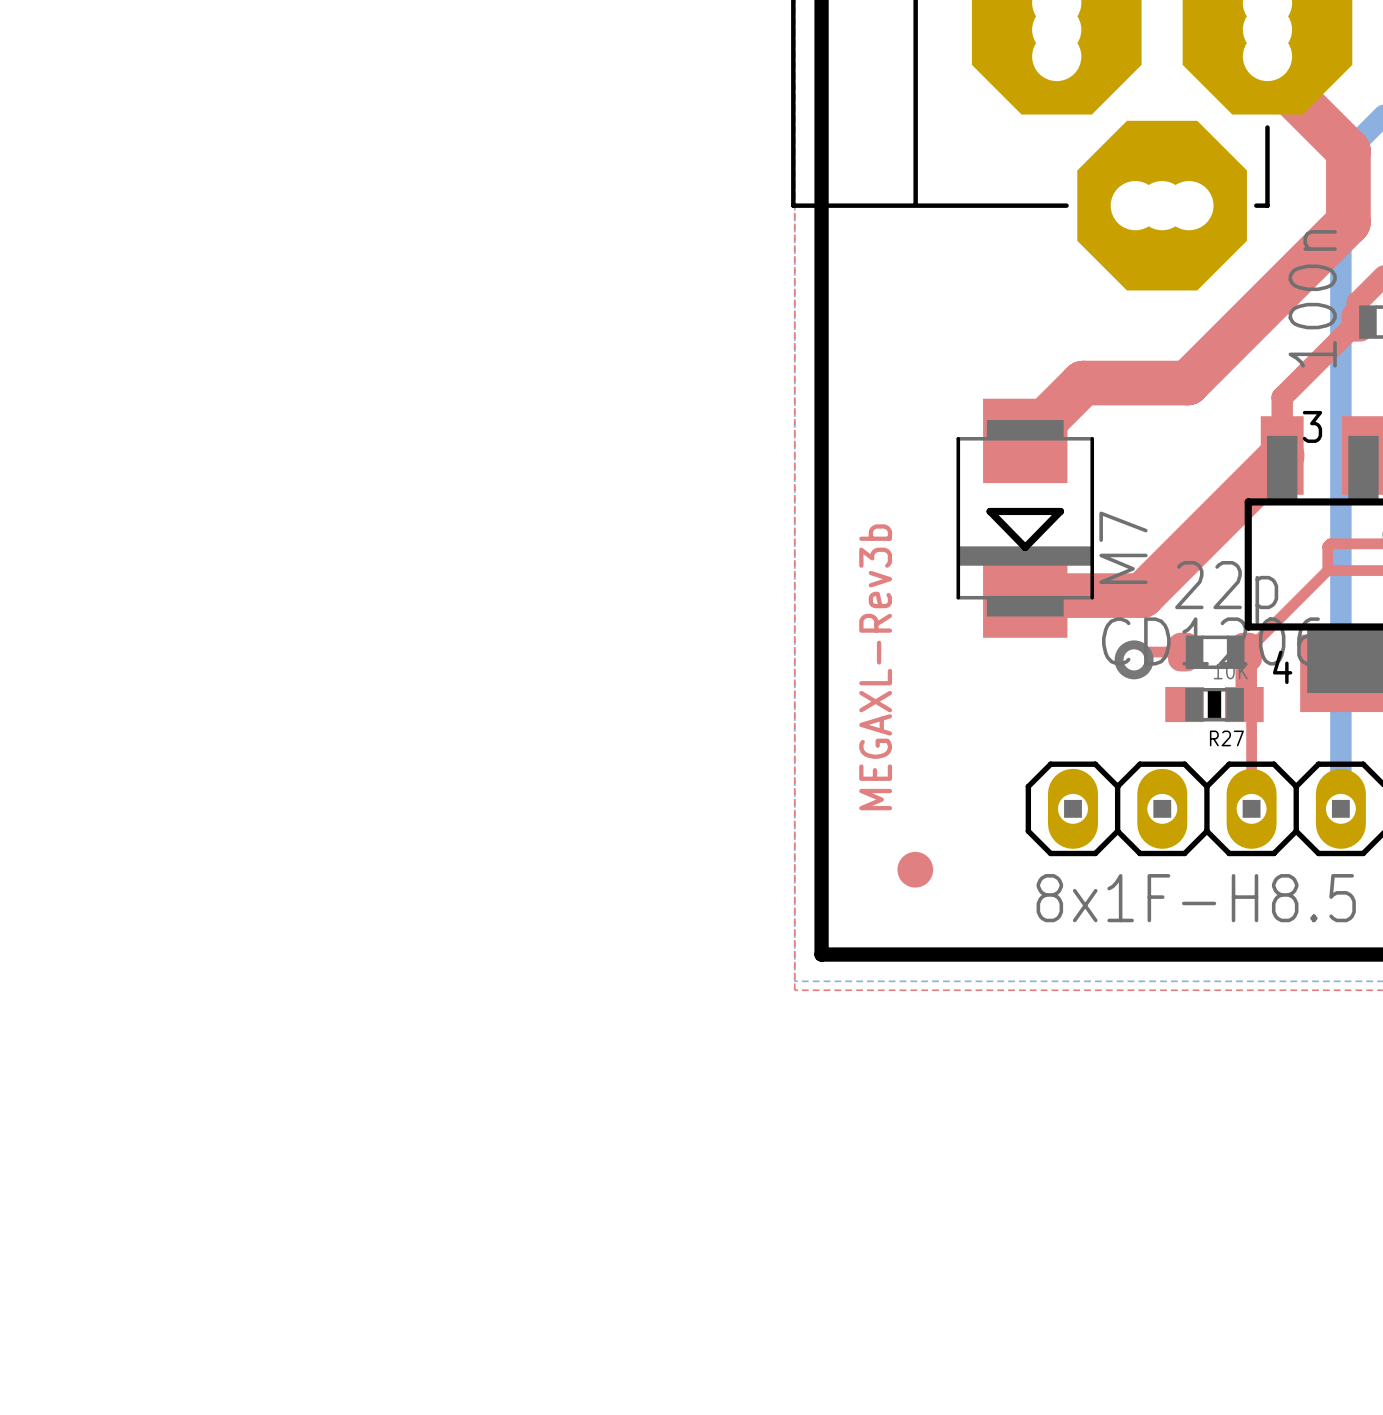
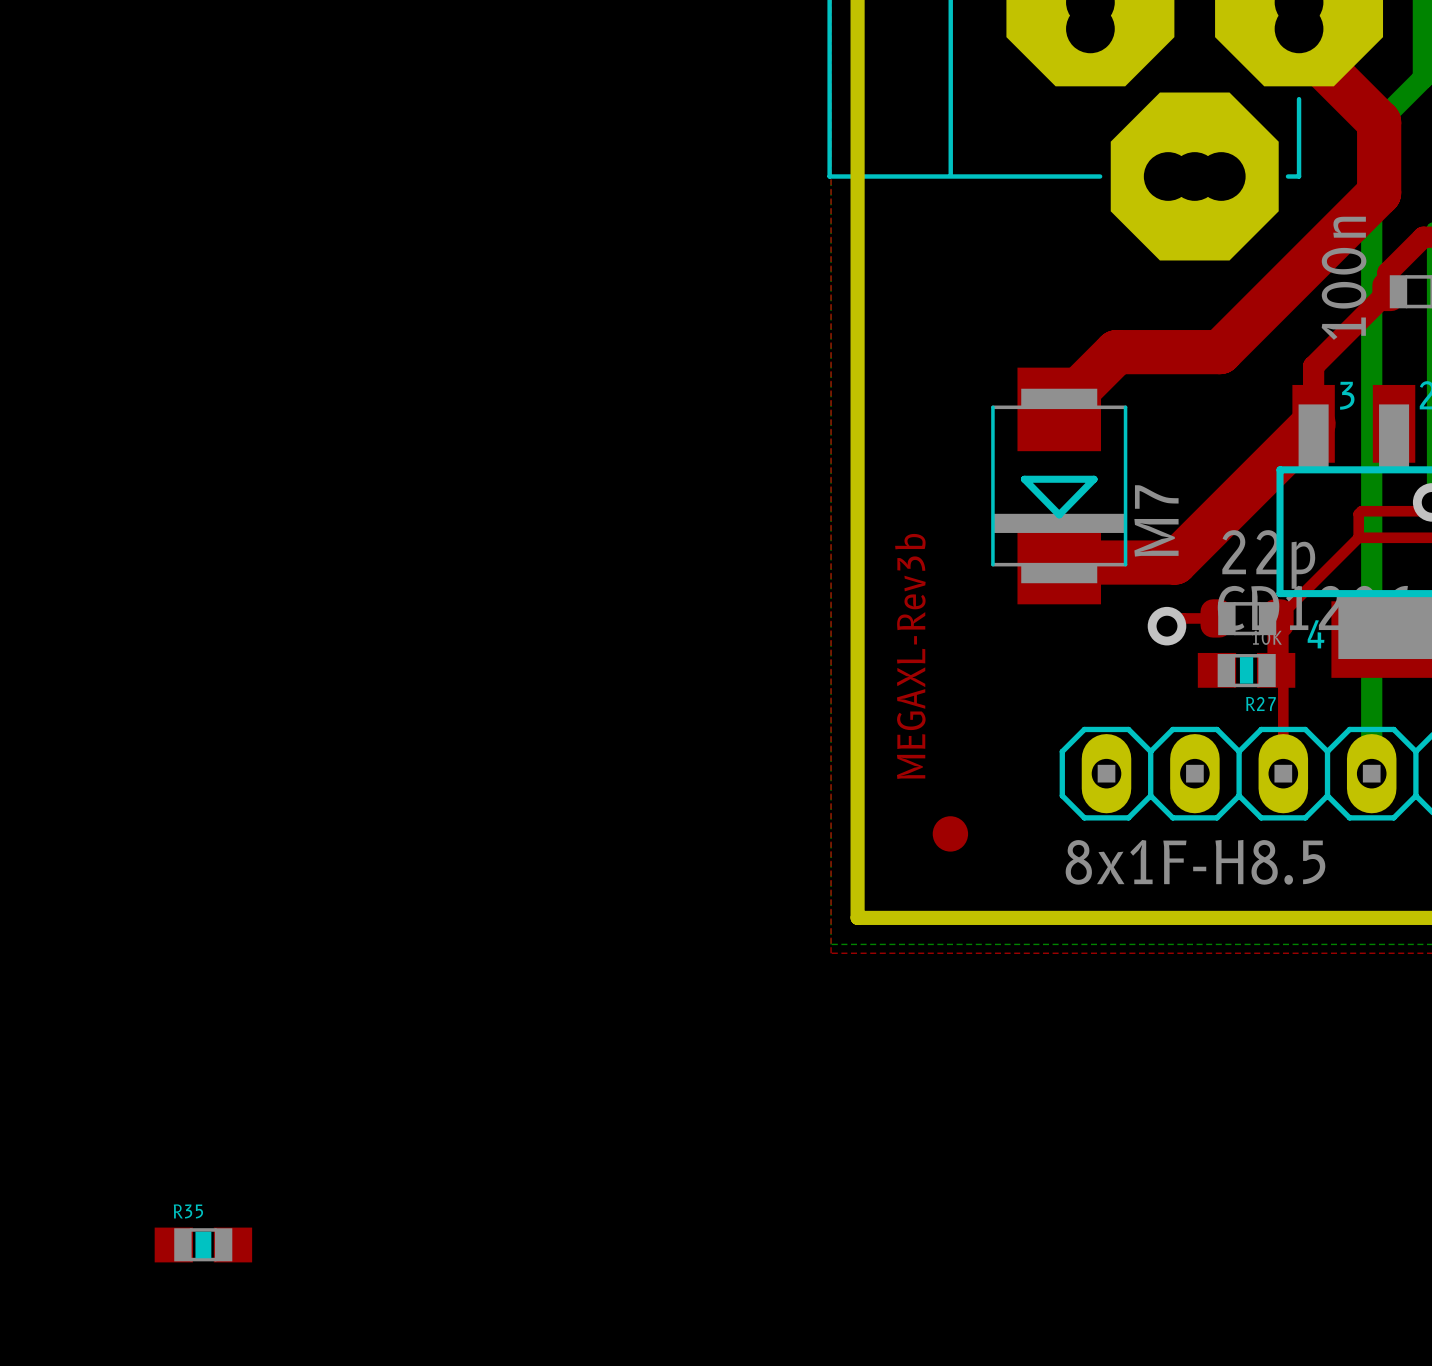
R35: none -> (203, 1244)

